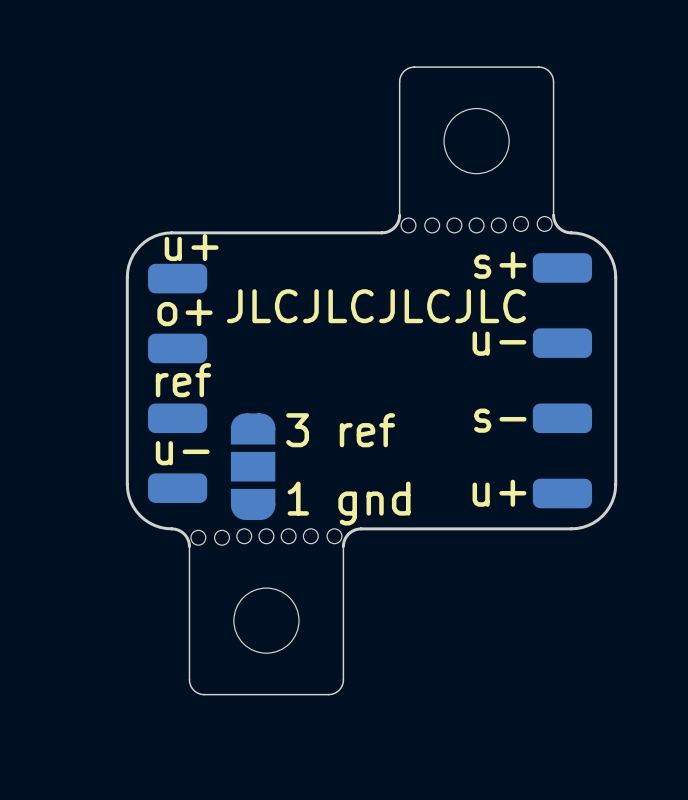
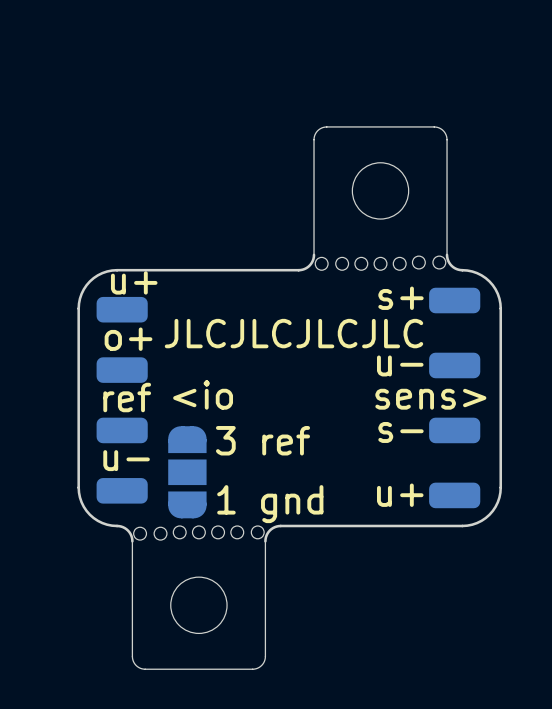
text: none -> <io sens> (329, 394)

